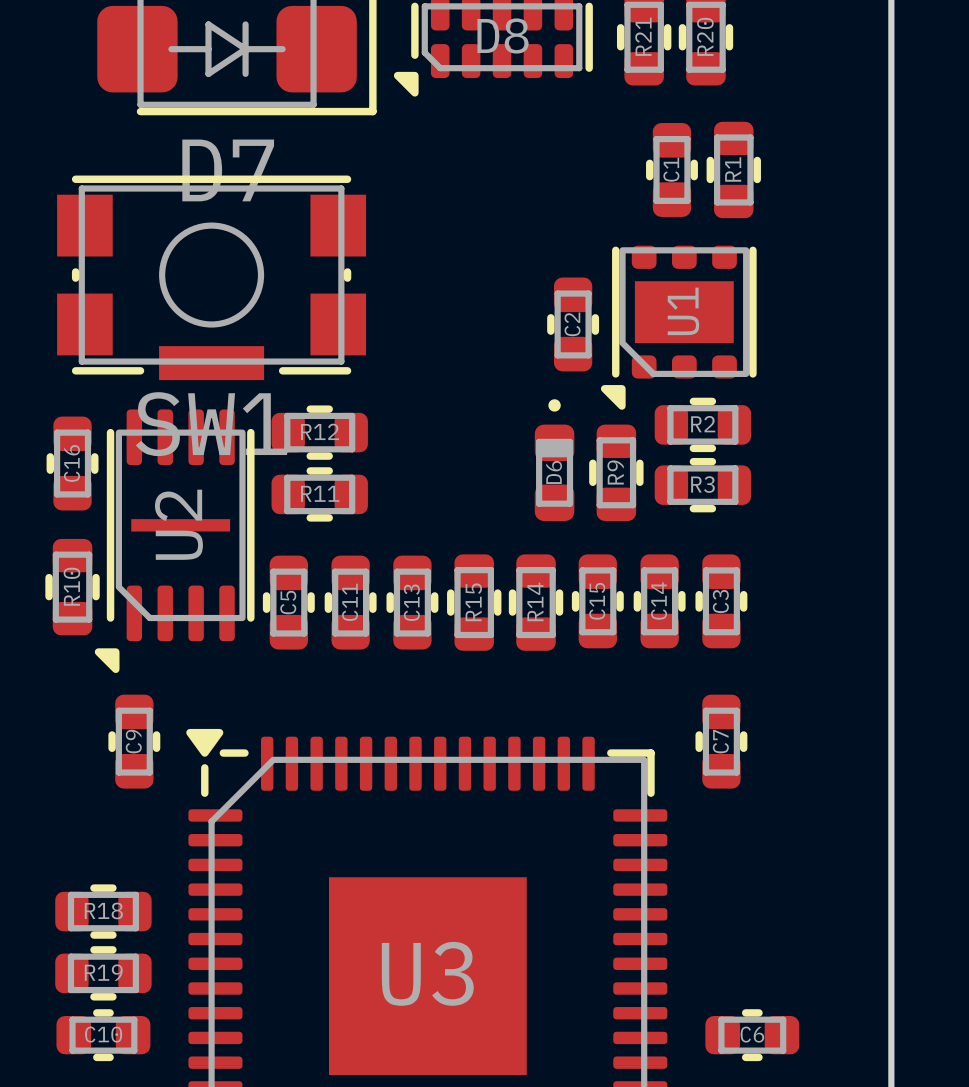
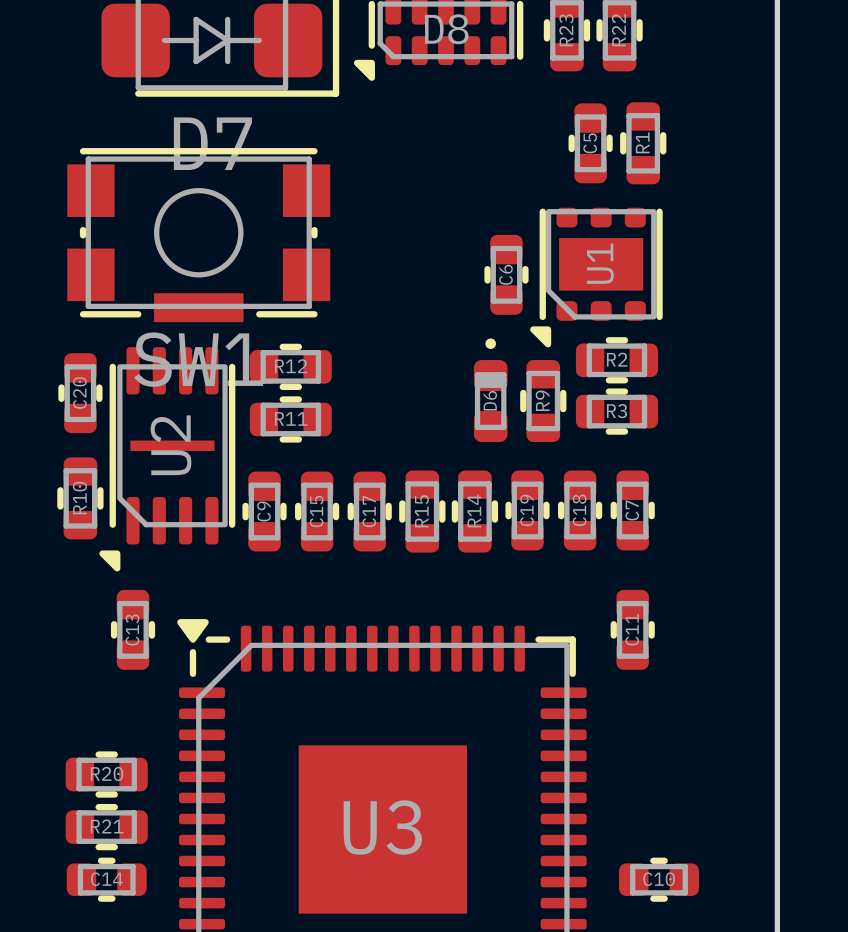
R21 name: R21 (643, 36) -> R23 (566, 30)
R20 name: R20 (705, 36) -> R22 (618, 30)
C1 name: C1 (671, 169) -> C5 (590, 143)
C2 name: C2 (572, 324) -> C6 (505, 274)
C16 name: C16 (71, 463) -> C20 (79, 393)
C14 name: C14 (659, 600) -> C18 (579, 510)
C15 name: C15 (597, 601) -> C19 (527, 510)
C3 name: C3 (720, 601) -> C7 (632, 510)
C5 name: C5 (288, 602) -> C9 (264, 511)
C11 name: C11 (350, 602) -> C15 (316, 511)
C13 name: C13 (411, 602) -> C17 (369, 511)
C9 name: C9 (133, 741) -> C13 (132, 629)
C7 name: C7 (720, 741) -> C11 (632, 629)
R18 name: R18 (103, 910) -> R20 (107, 774)
R19 name: R19 (103, 972) -> R21 (107, 826)
C10 name: C10 (103, 1034) -> C14 (107, 879)
C6 name: C6 (752, 1034) -> C10 (659, 879)

